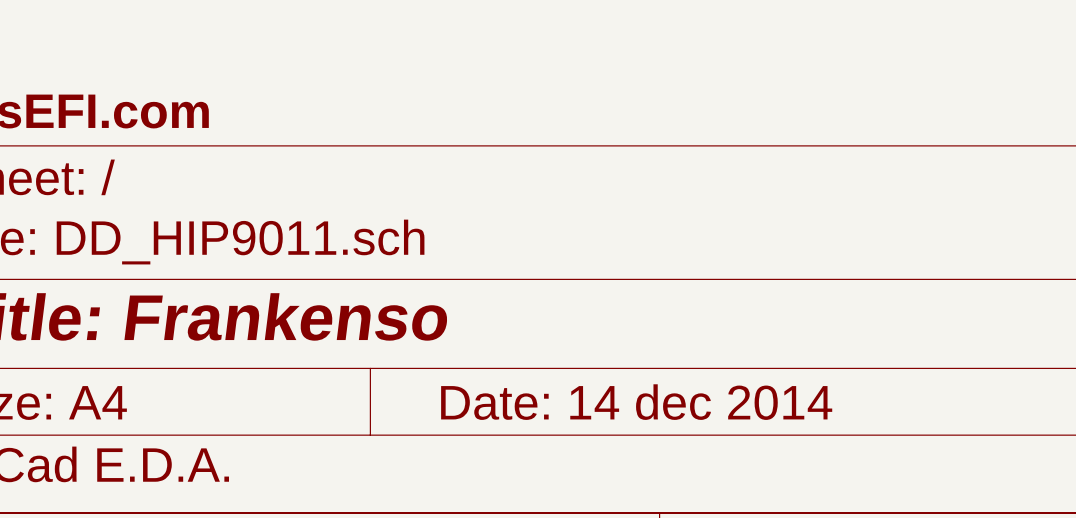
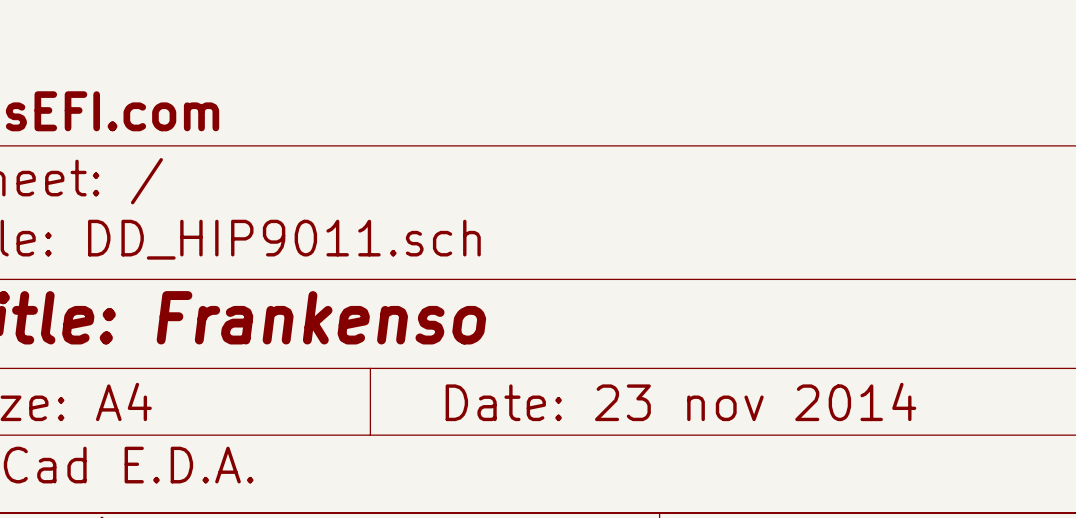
title block: Date: 14 dec 2014 (636, 402) -> Date: 23 nov 2014 (680, 401)

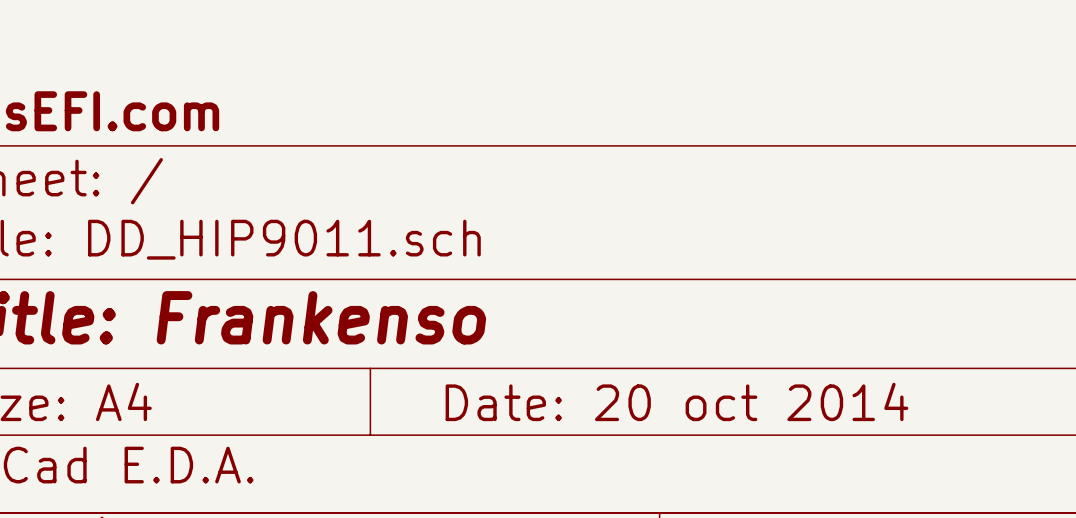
title block: Date: 23 nov 2014 (680, 401) -> Date: 20 oct 2014 (676, 401)

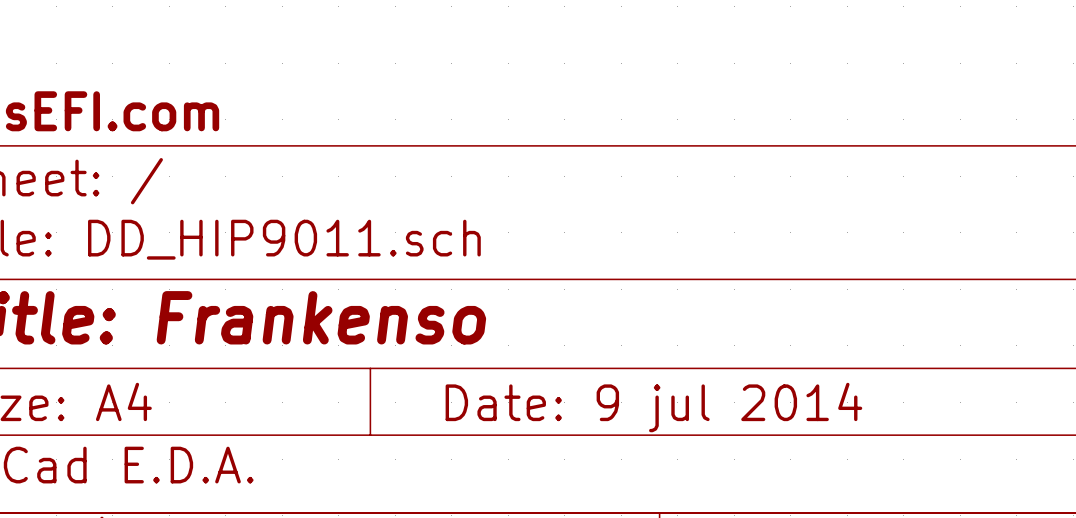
title block: Date: 20 oct 2014 (676, 401) -> Date: 9 jul 2014 (653, 407)

